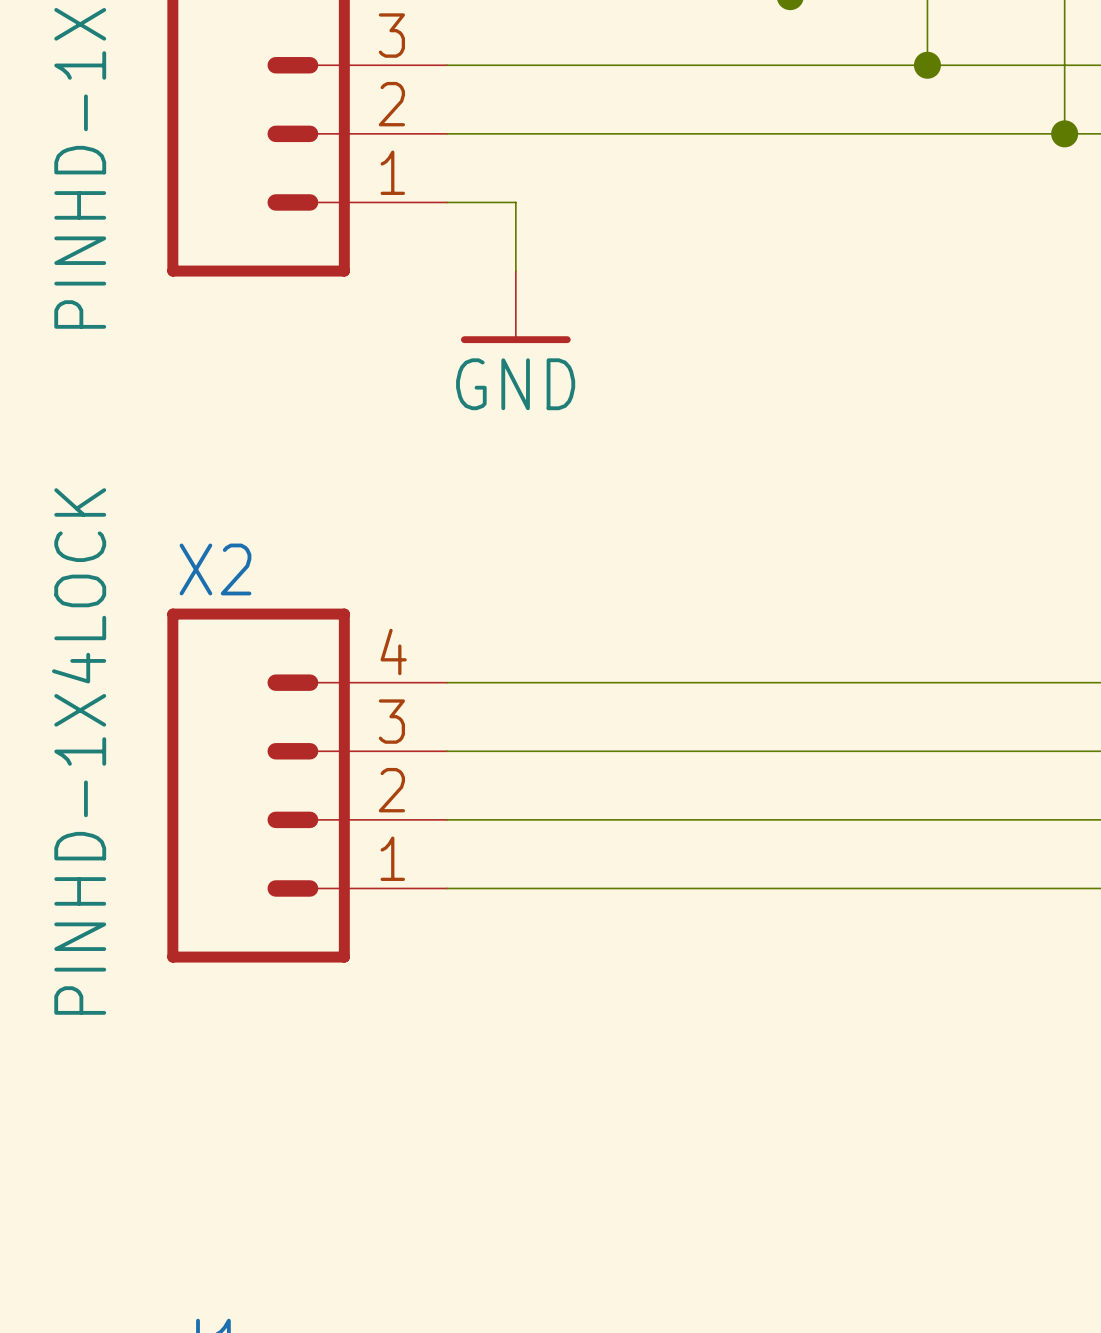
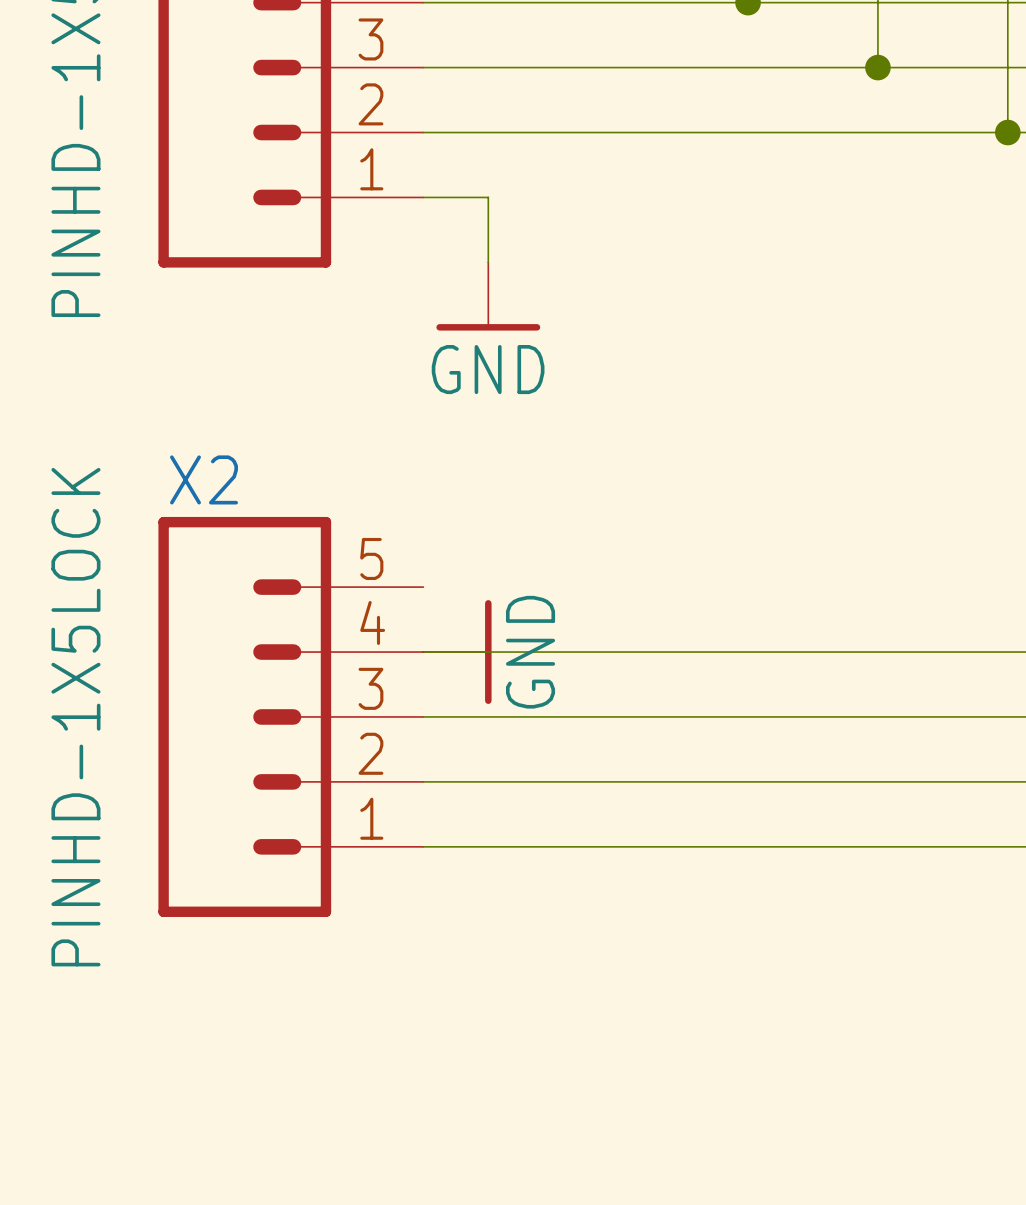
X2 symbol: [167, 608, 448, 963] -> [158, 516, 424, 917]
power symbol: none -> GND (457, 652)
X2 value: PINHD-1X4LOCK (79, 751) -> PINHD-1X5LOCK (75, 717)

